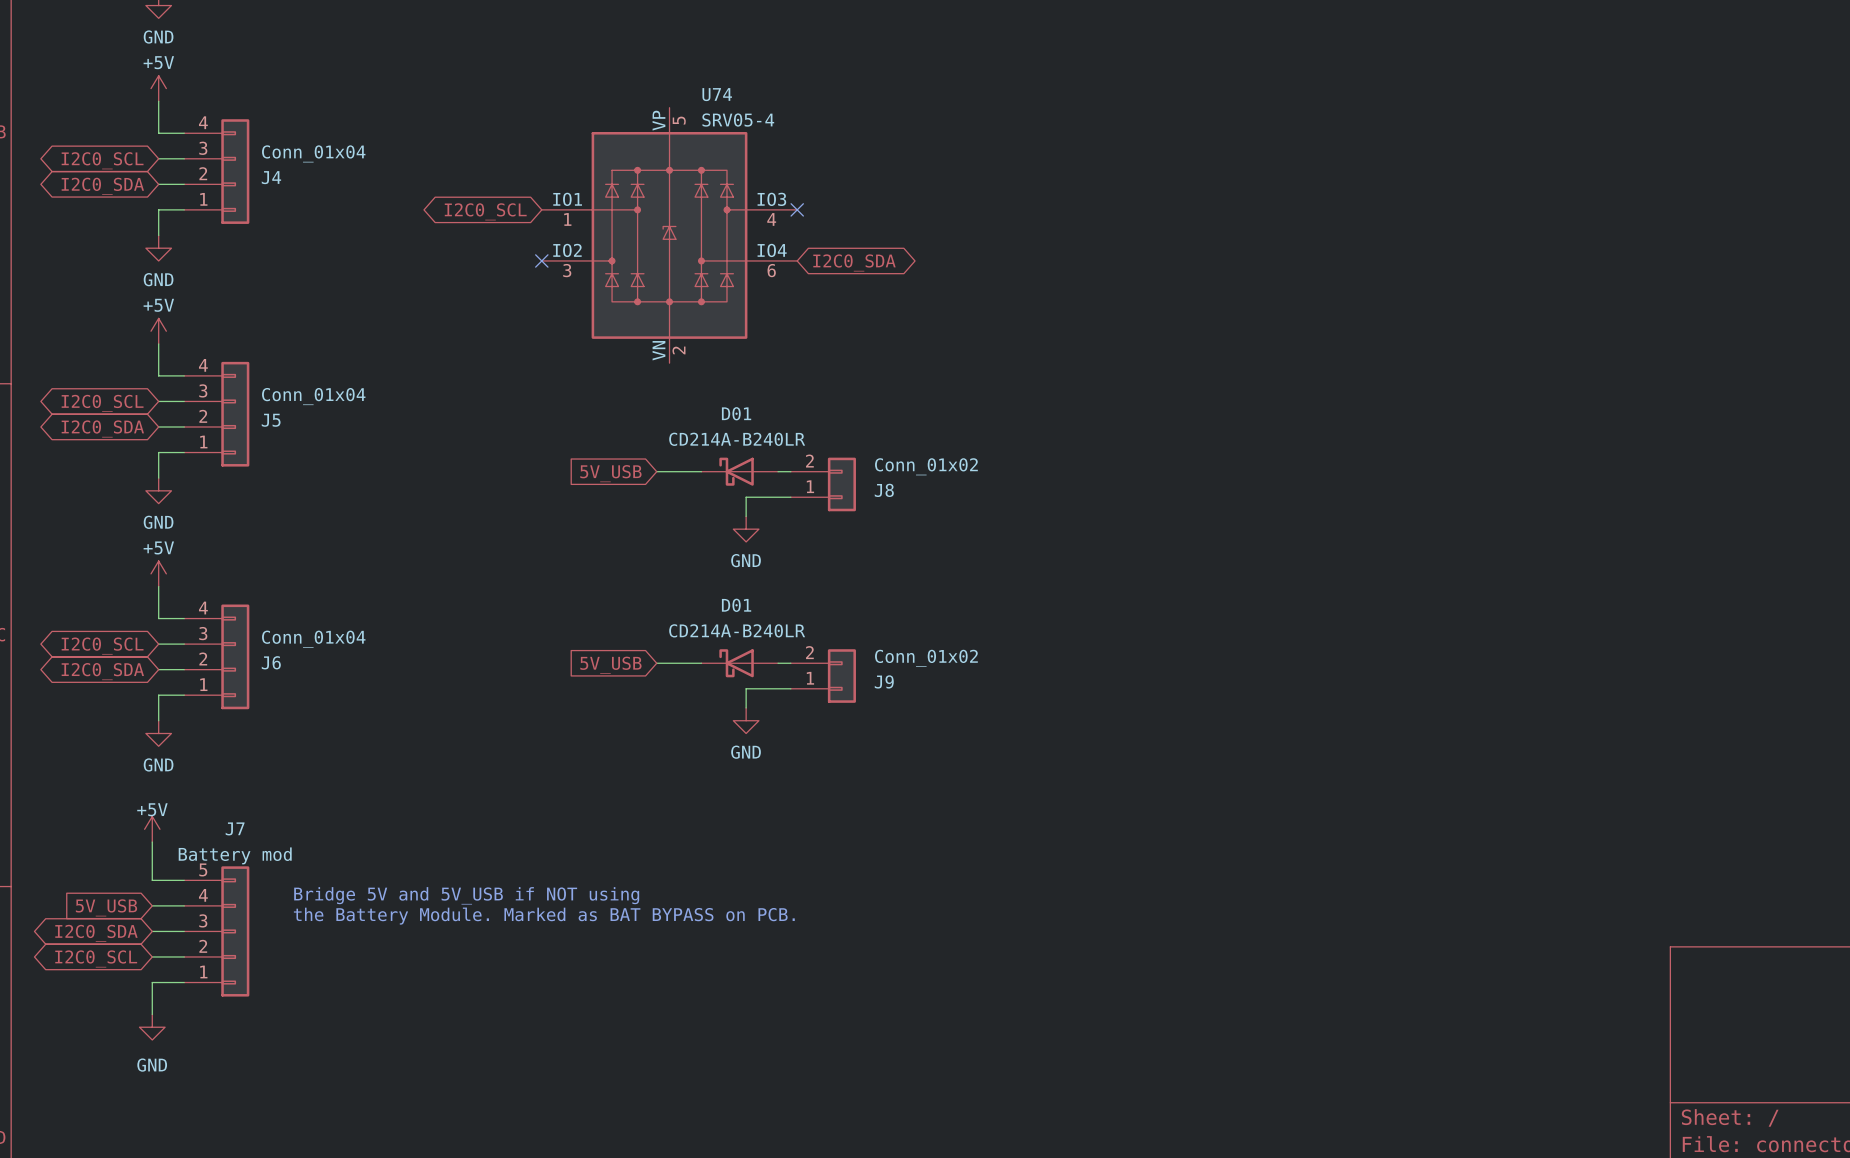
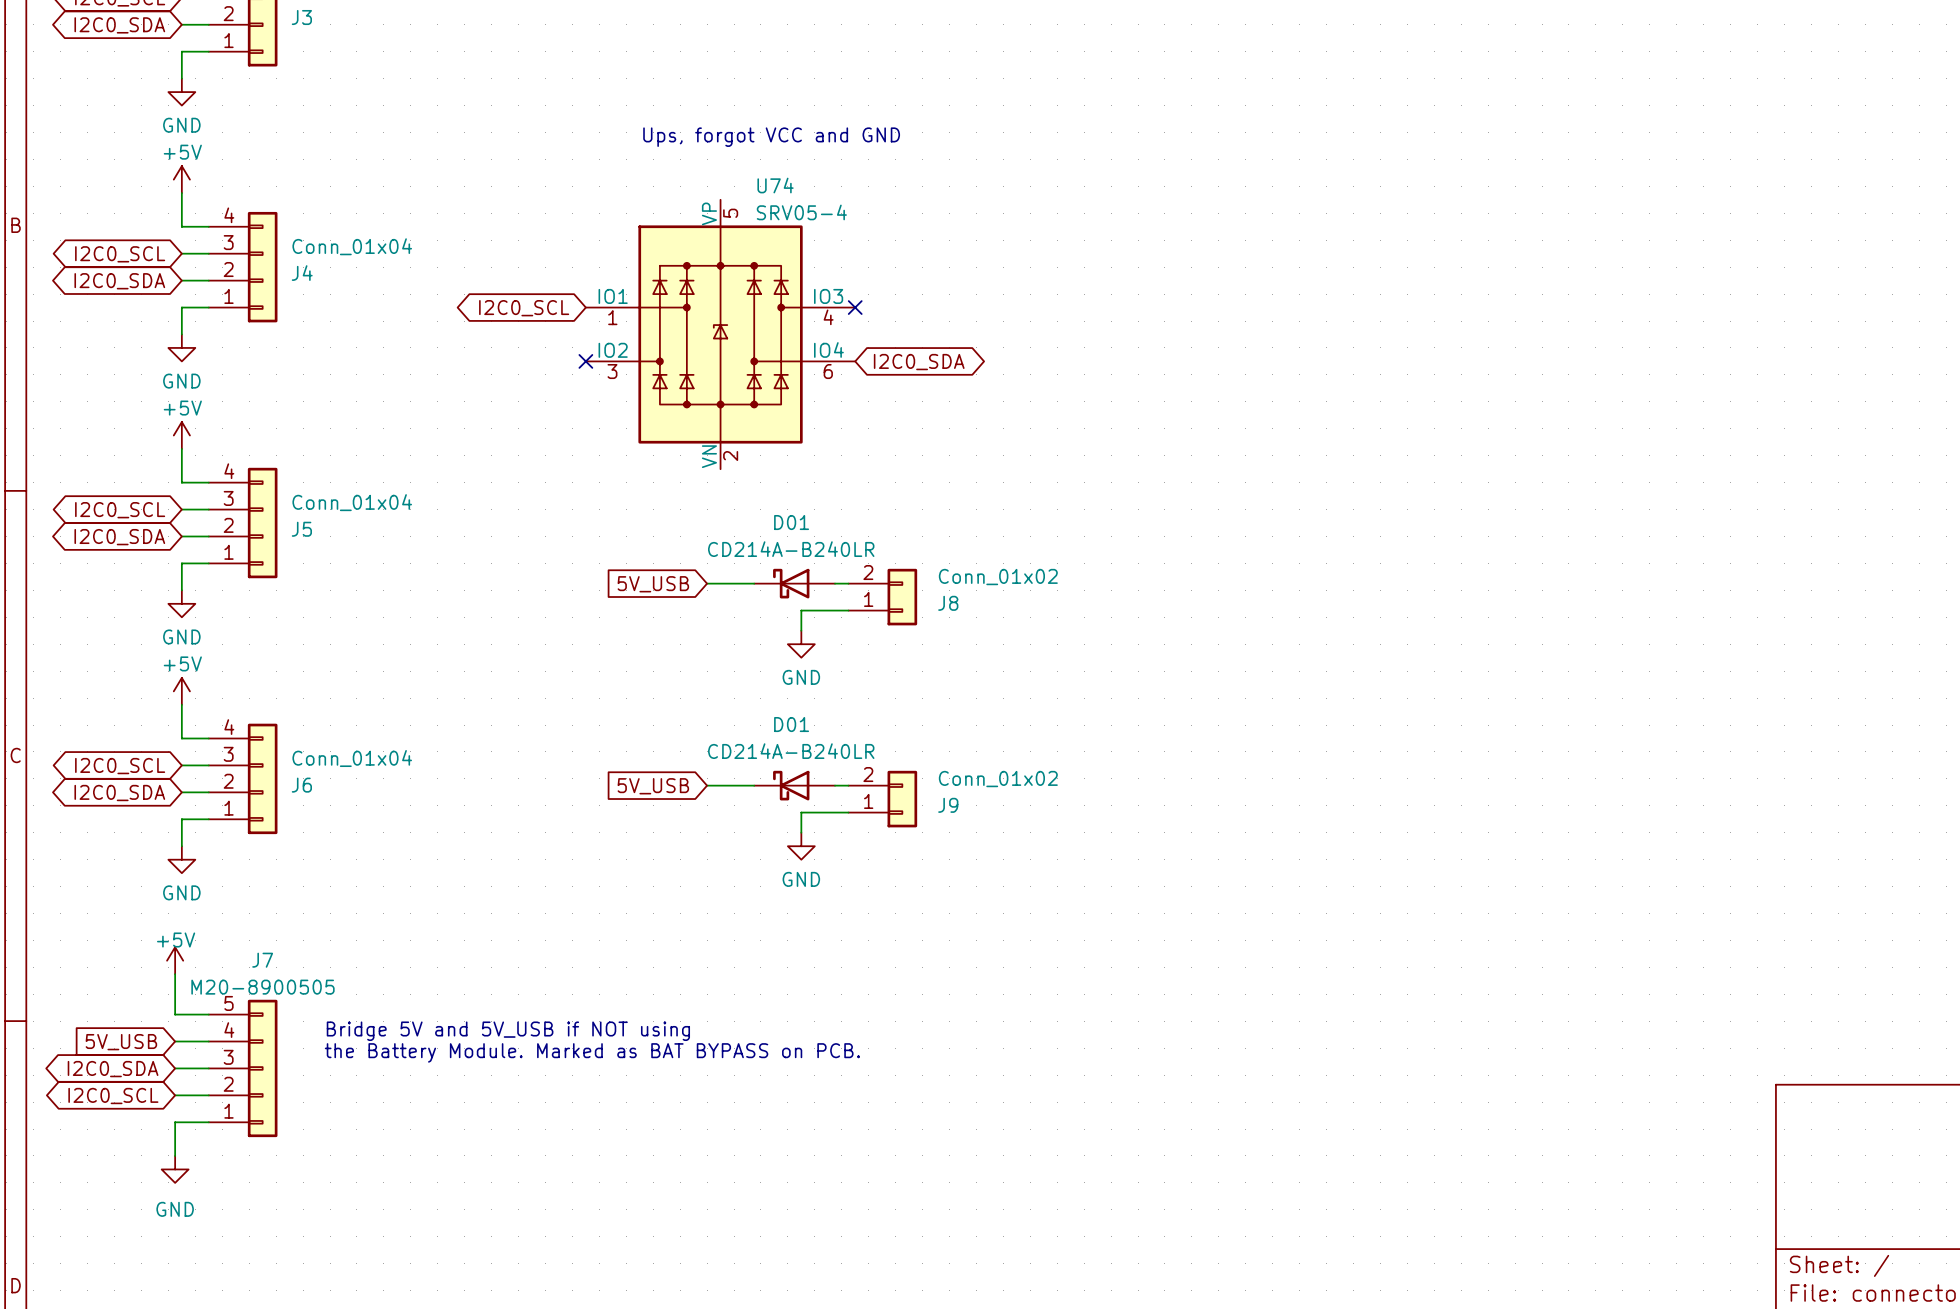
text: none -> Ups, forgot VCC and GND (771, 137)
J7 value: Battery mod (235, 855) -> M20-8900505 (262, 987)

